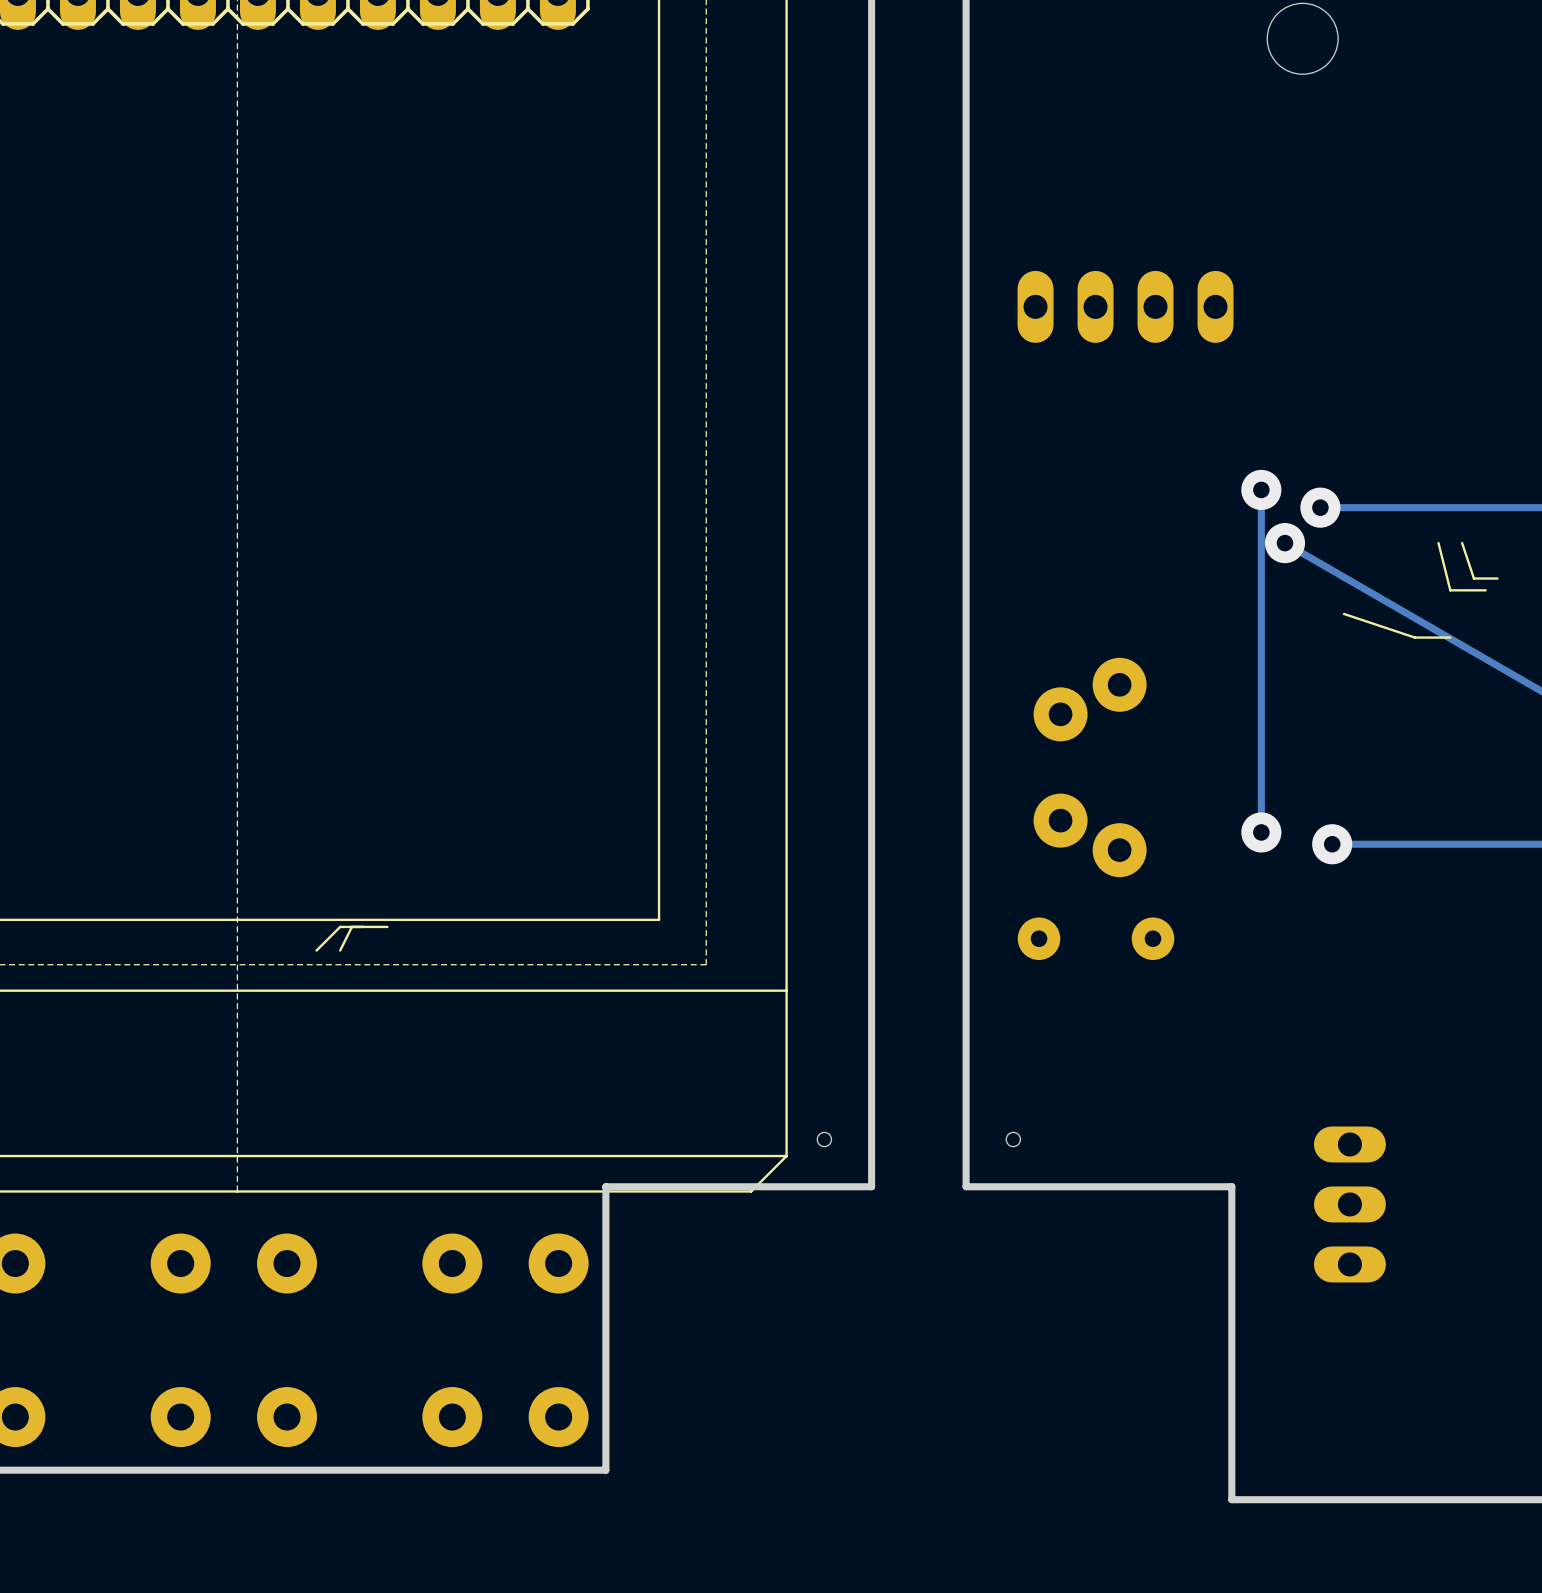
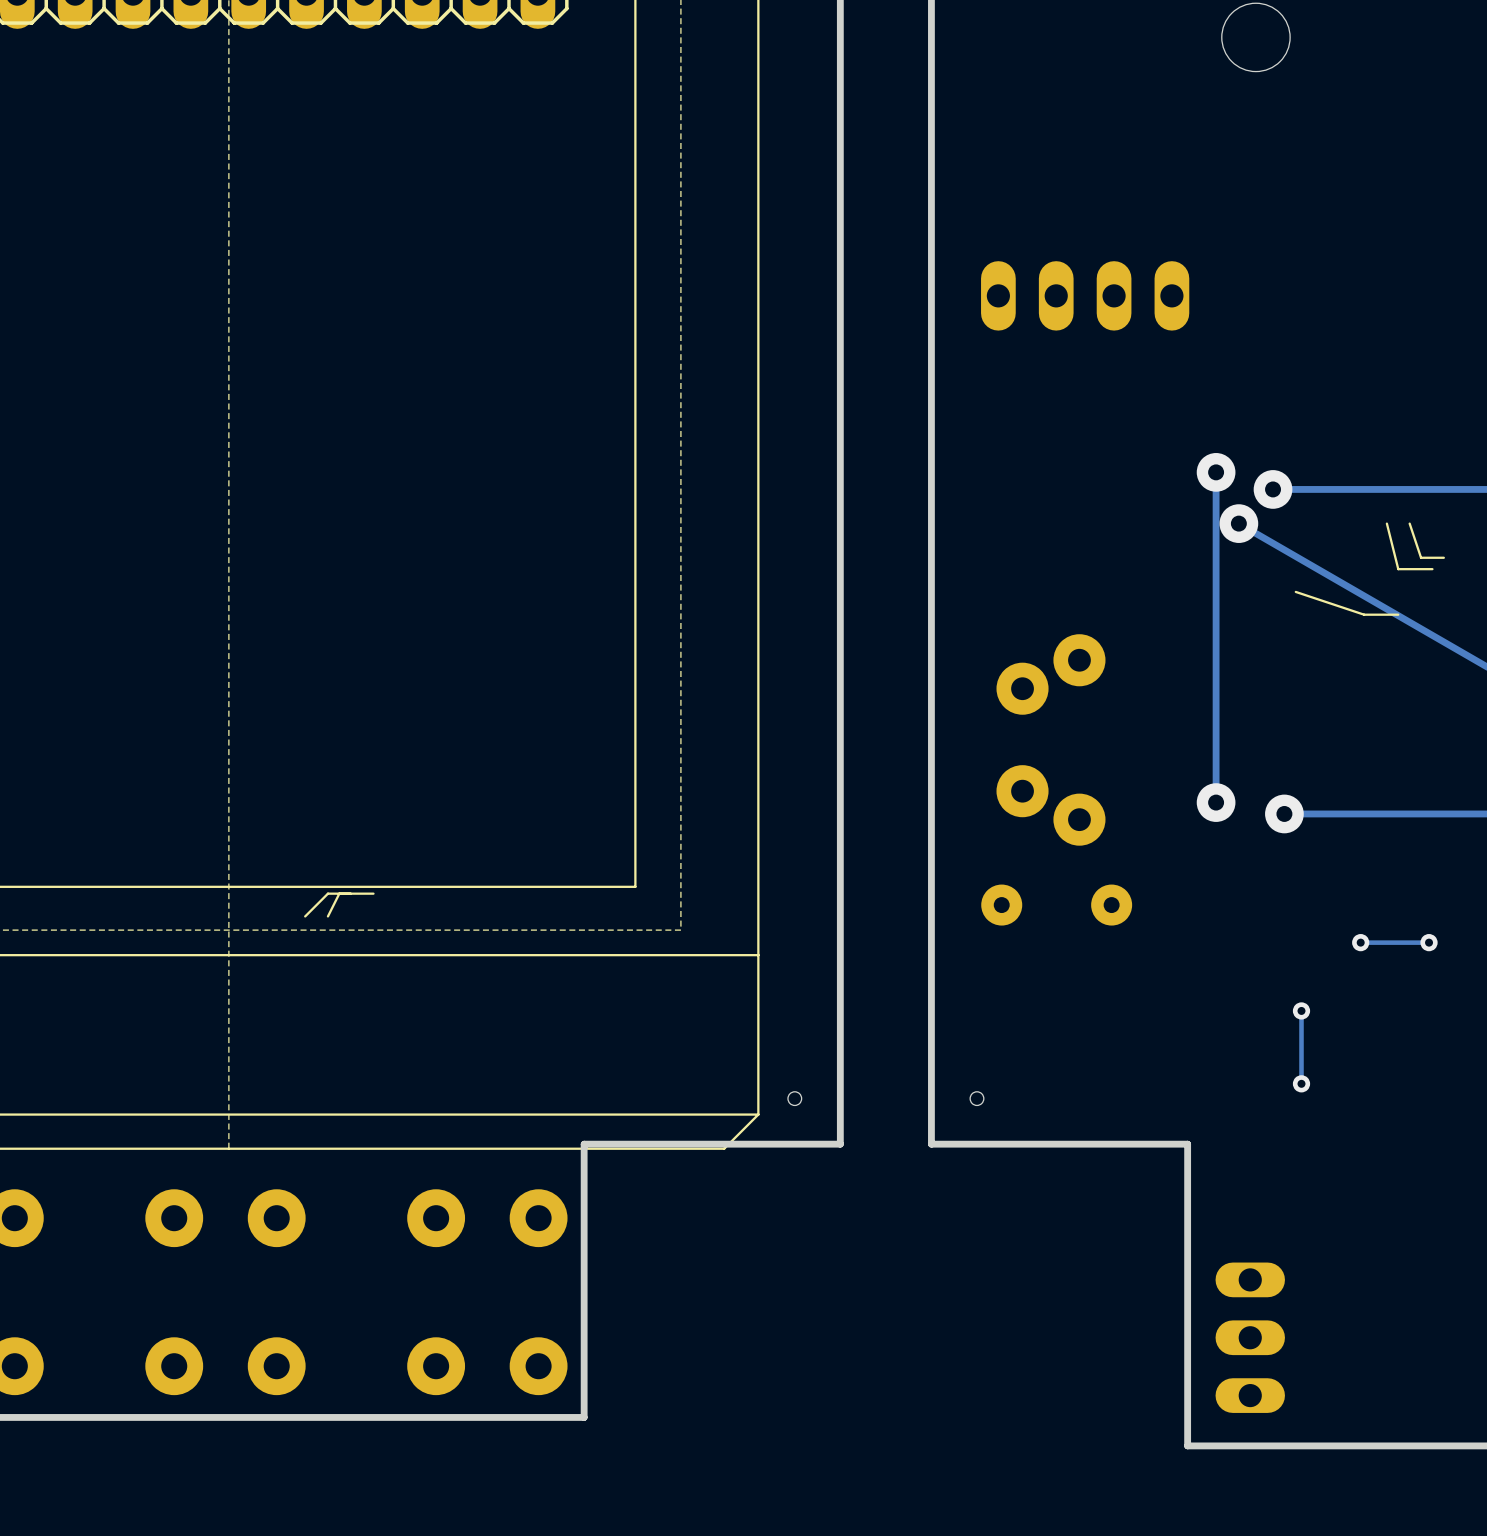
via: none -> (1360, 942)
track: none -> (1429, 942) (1360, 942)
via: none -> (1429, 942)
track: none -> (1301, 1010) (1301, 1083)
via: none -> (1301, 1010)
via: none -> (1301, 1083)
part position: (1349, 1204) -> (1250, 1337)

